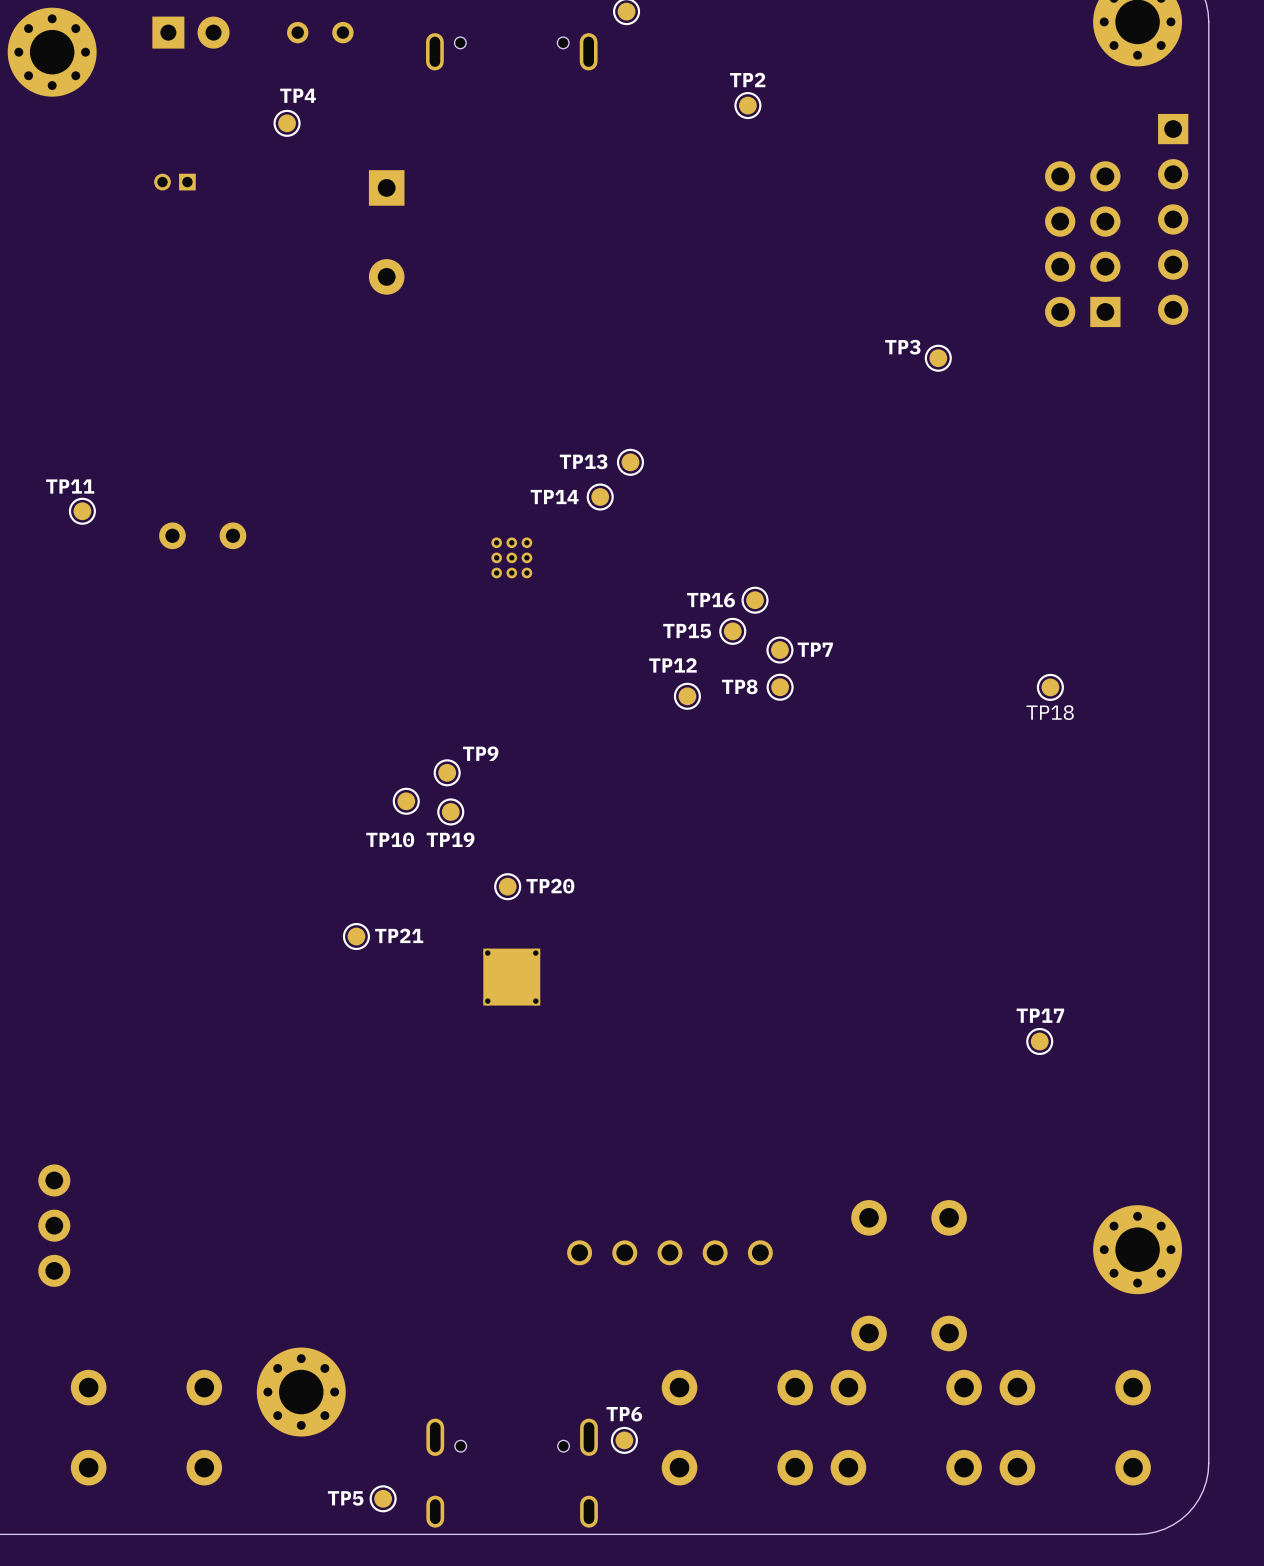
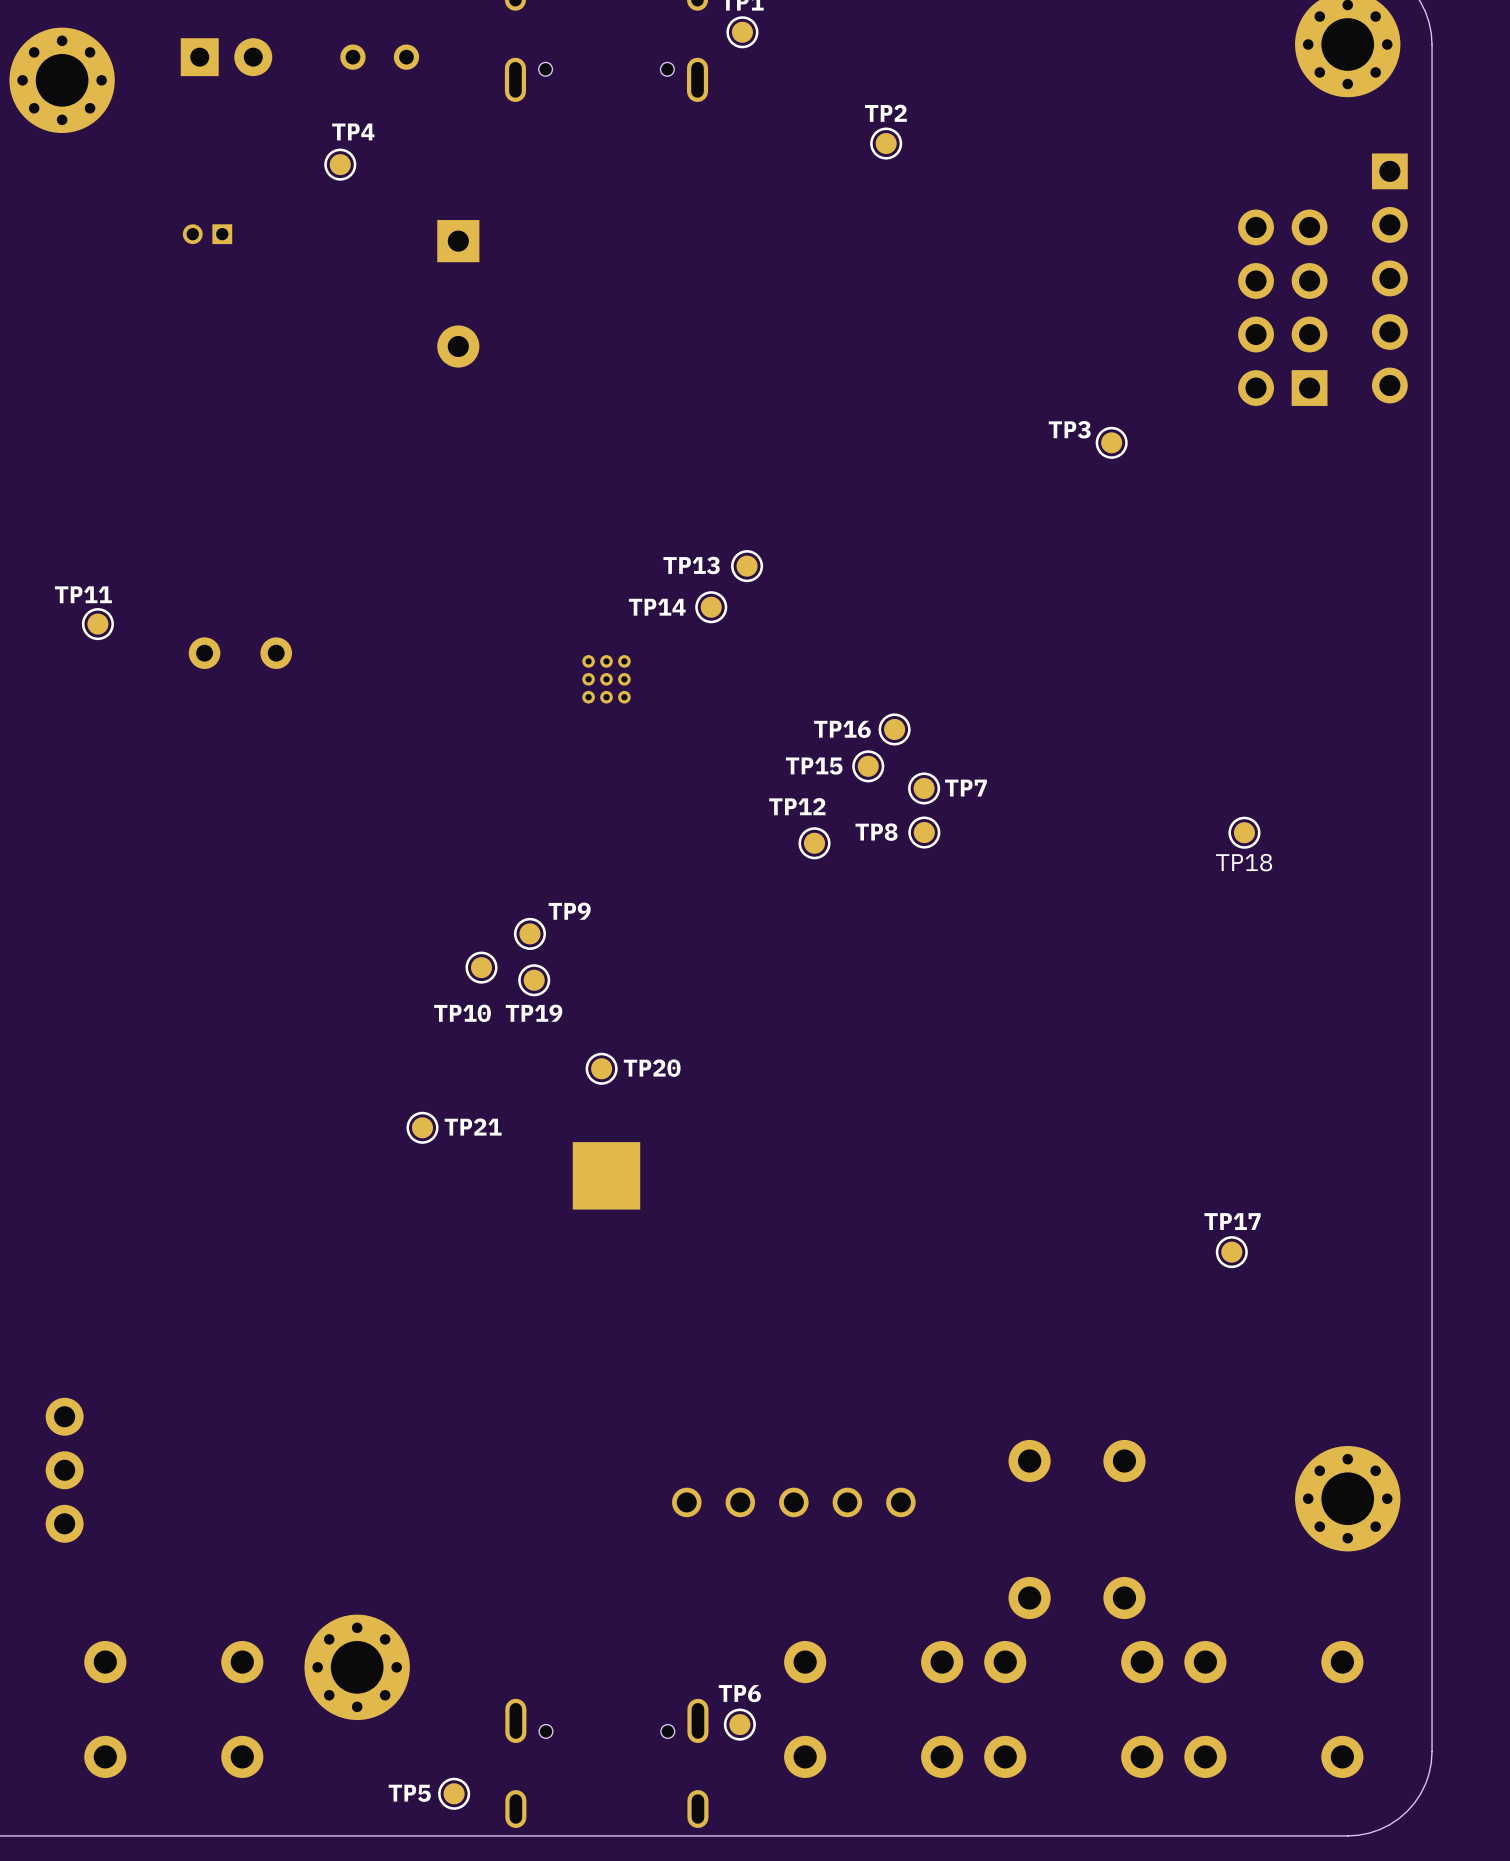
part footprint: [483, 948, 541, 1006] -> [572, 1142, 641, 1210]

